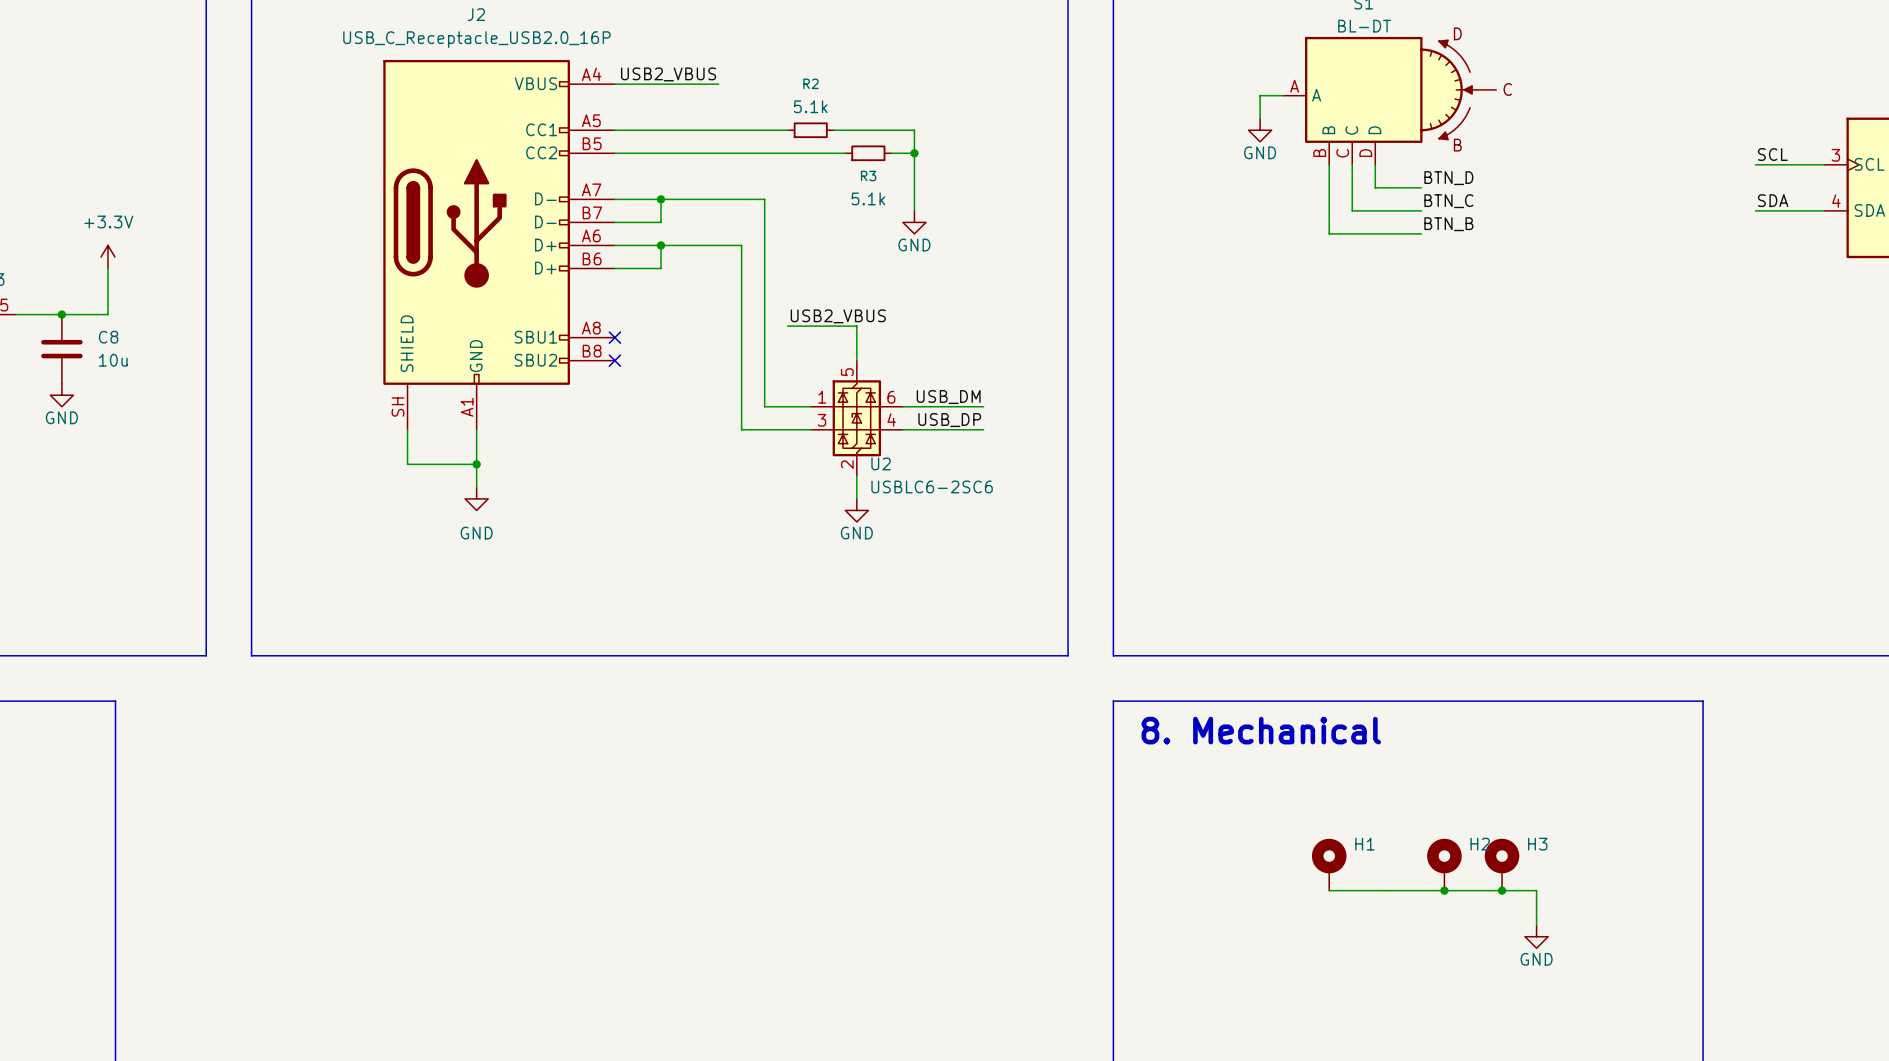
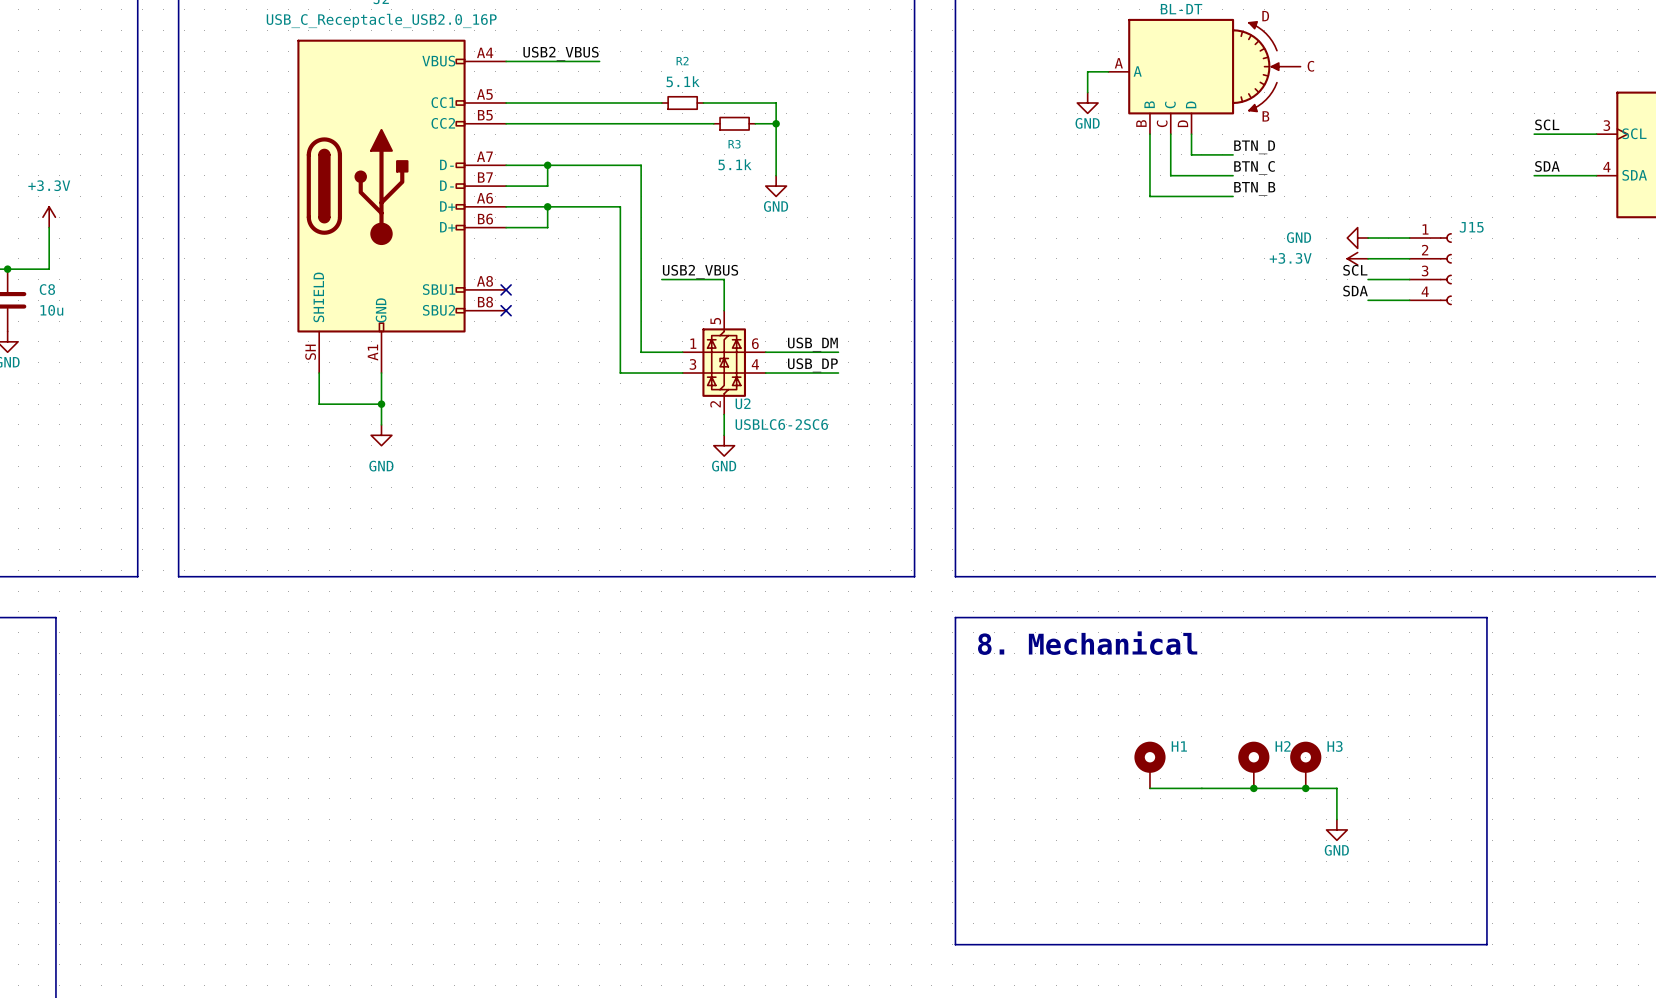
power symbol: none -> GND (1357, 238)
wire: none -> (1368, 238) (1409, 238)
power symbol: none -> +3.3V (1357, 258)
wire: none -> (1368, 258) (1409, 258)
J15: none -> (1430, 269)
label: none -> SCL (1355, 270)
wire: none -> (1368, 279) (1409, 279)
label: none -> SDA (1355, 291)
wire: none -> (1368, 300) (1409, 300)

